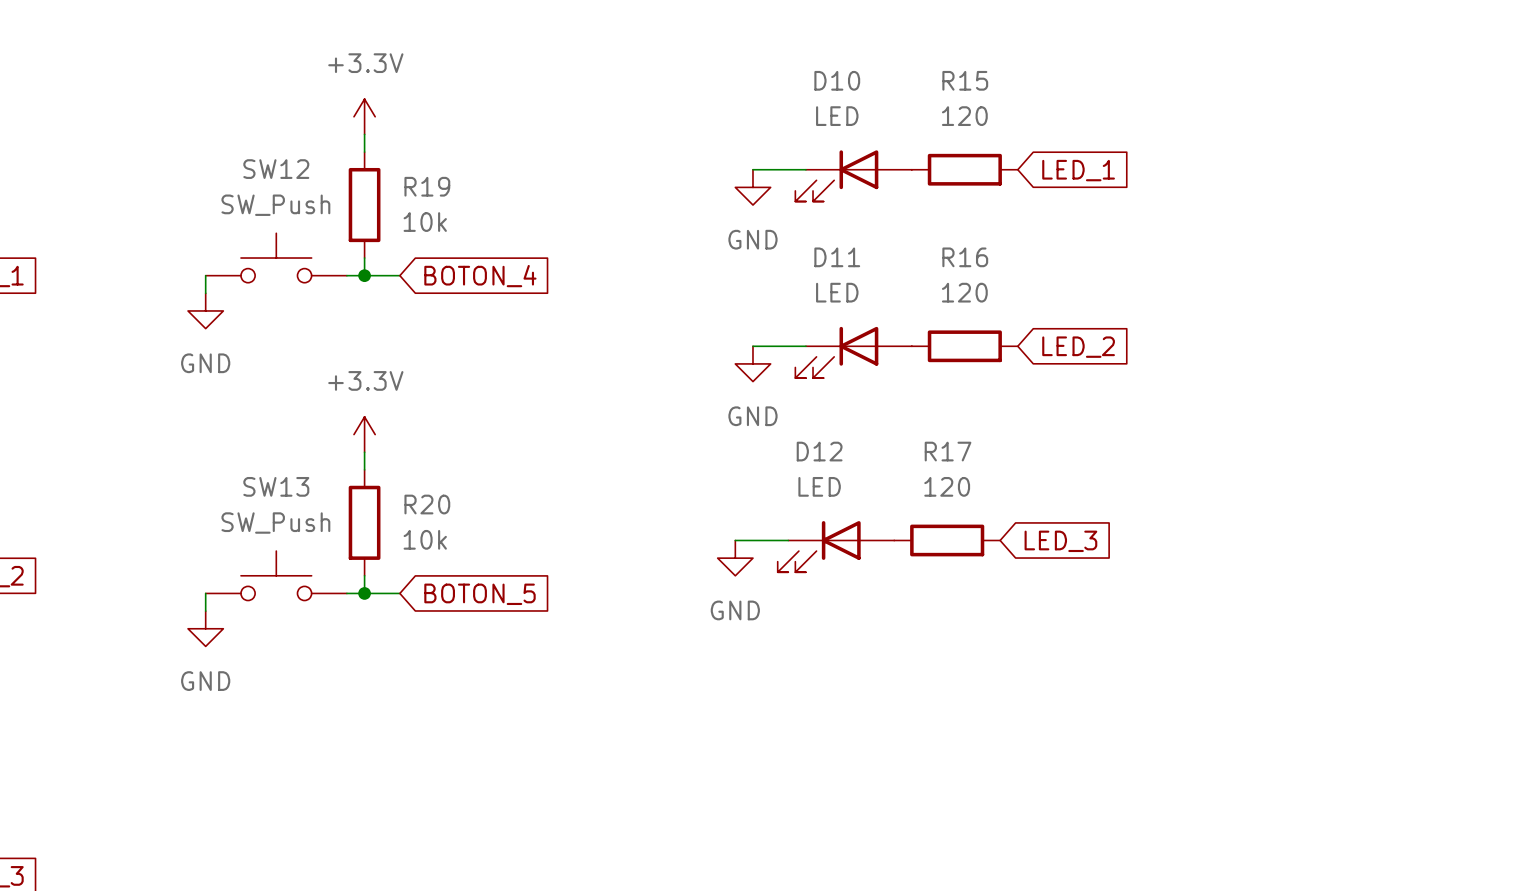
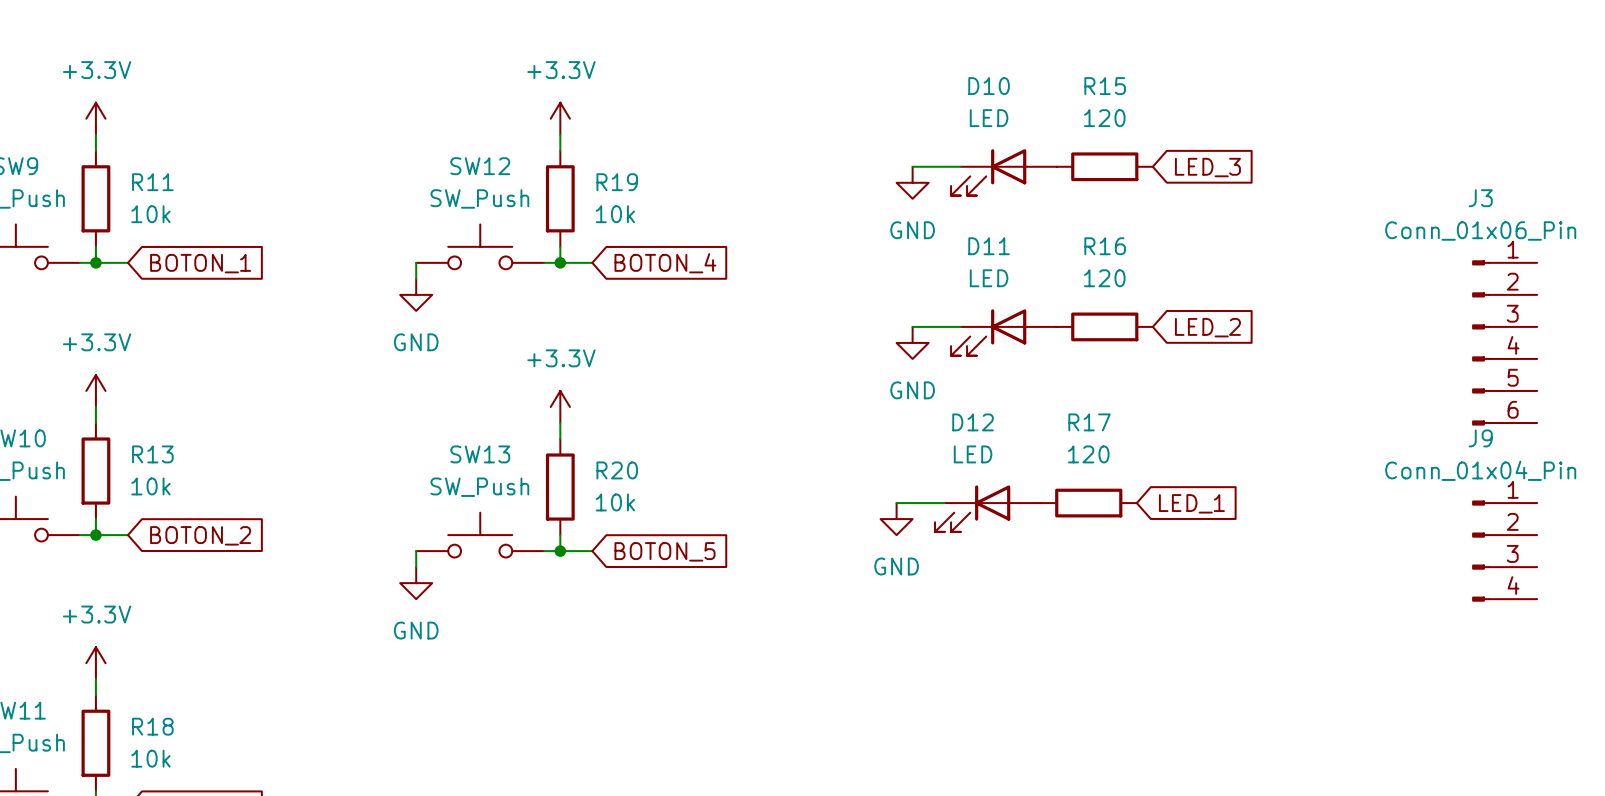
global label: LED_1 (1078, 170) -> LED_3 (1207, 167)
J3: none -> Conn_01x06_Pin (1504, 342)
global label: LED_3 (1060, 541) -> LED_1 (1191, 503)
J9: none -> Conn_01x04_Pin (1504, 551)

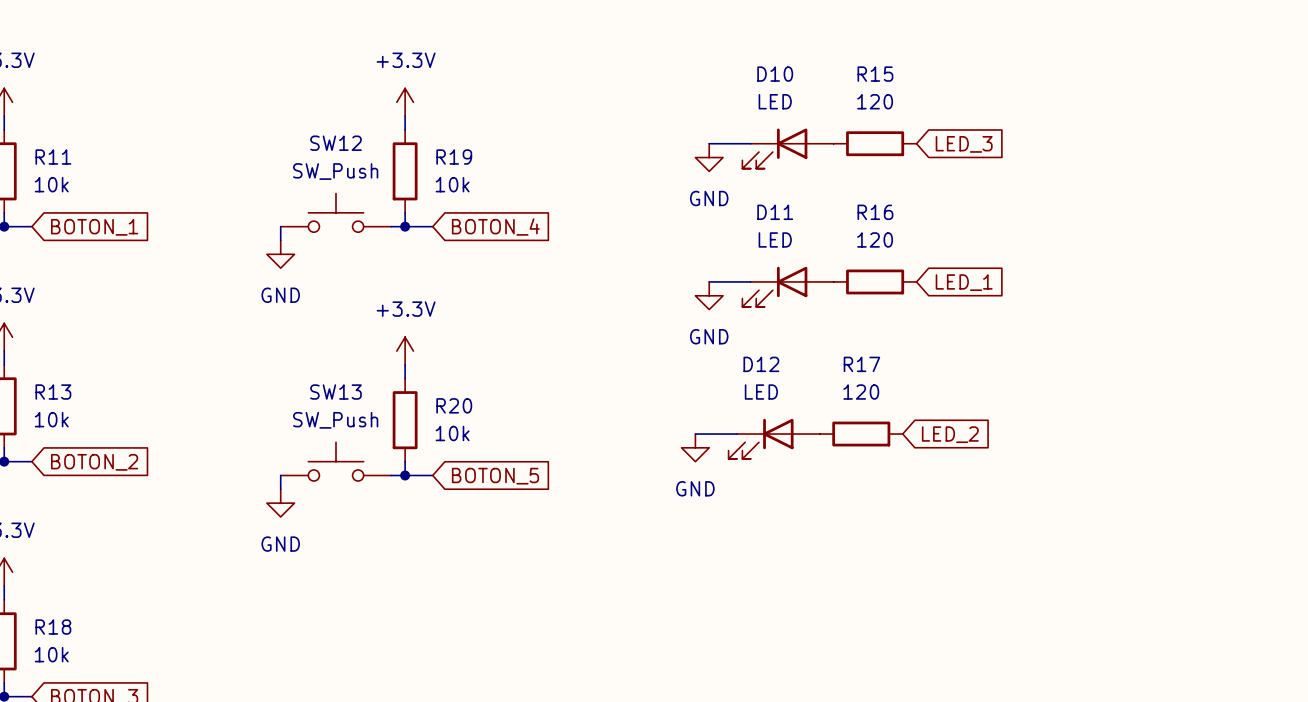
global label: LED_2 (1207, 327) -> LED_1 (964, 282)
J3: Conn_01x06_Pin (1504, 342) -> none
global label: LED_1 (1191, 503) -> LED_2 (950, 434)
J9: Conn_01x04_Pin (1504, 551) -> none

